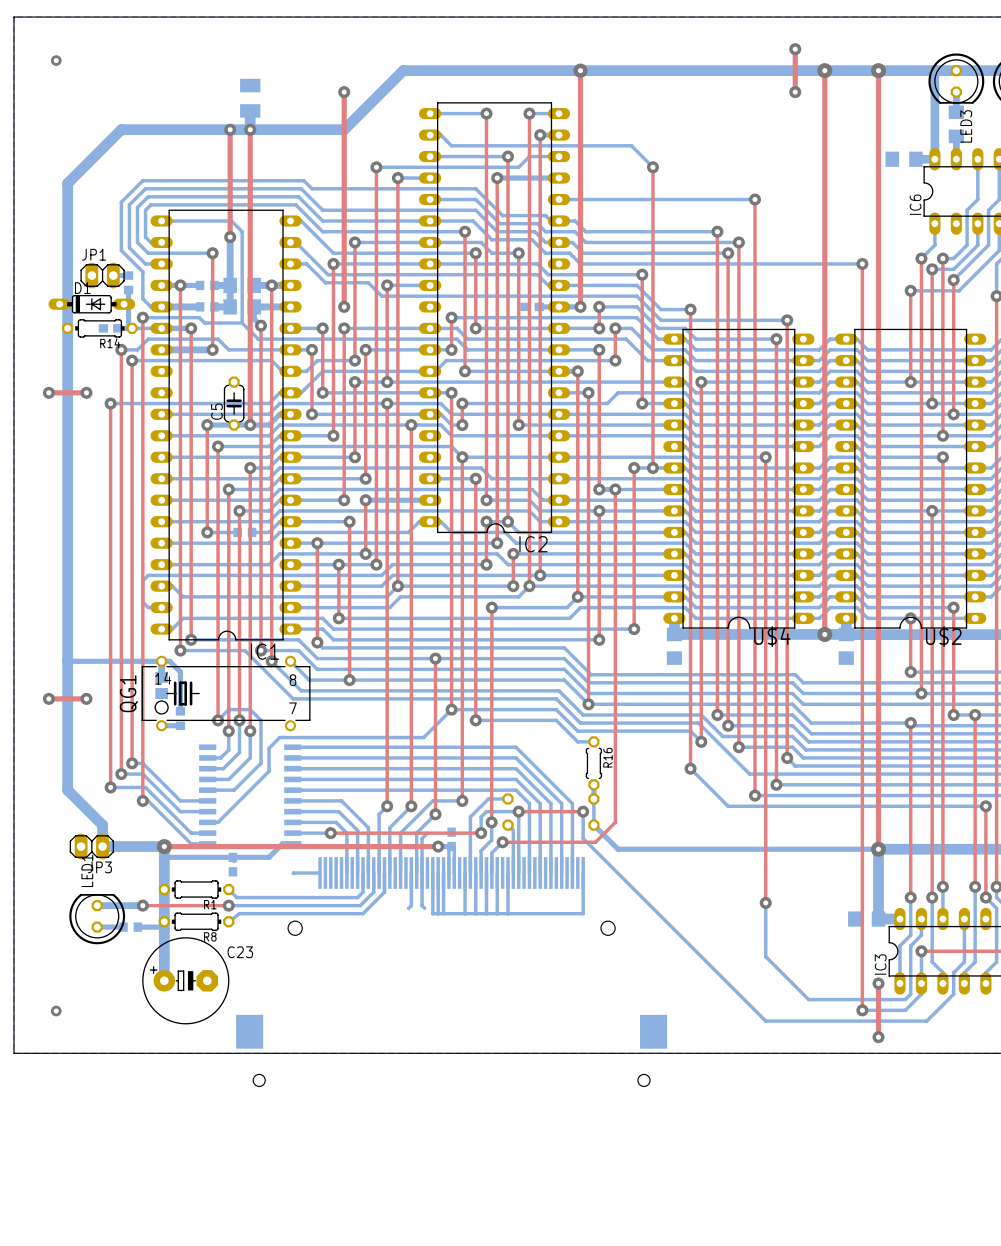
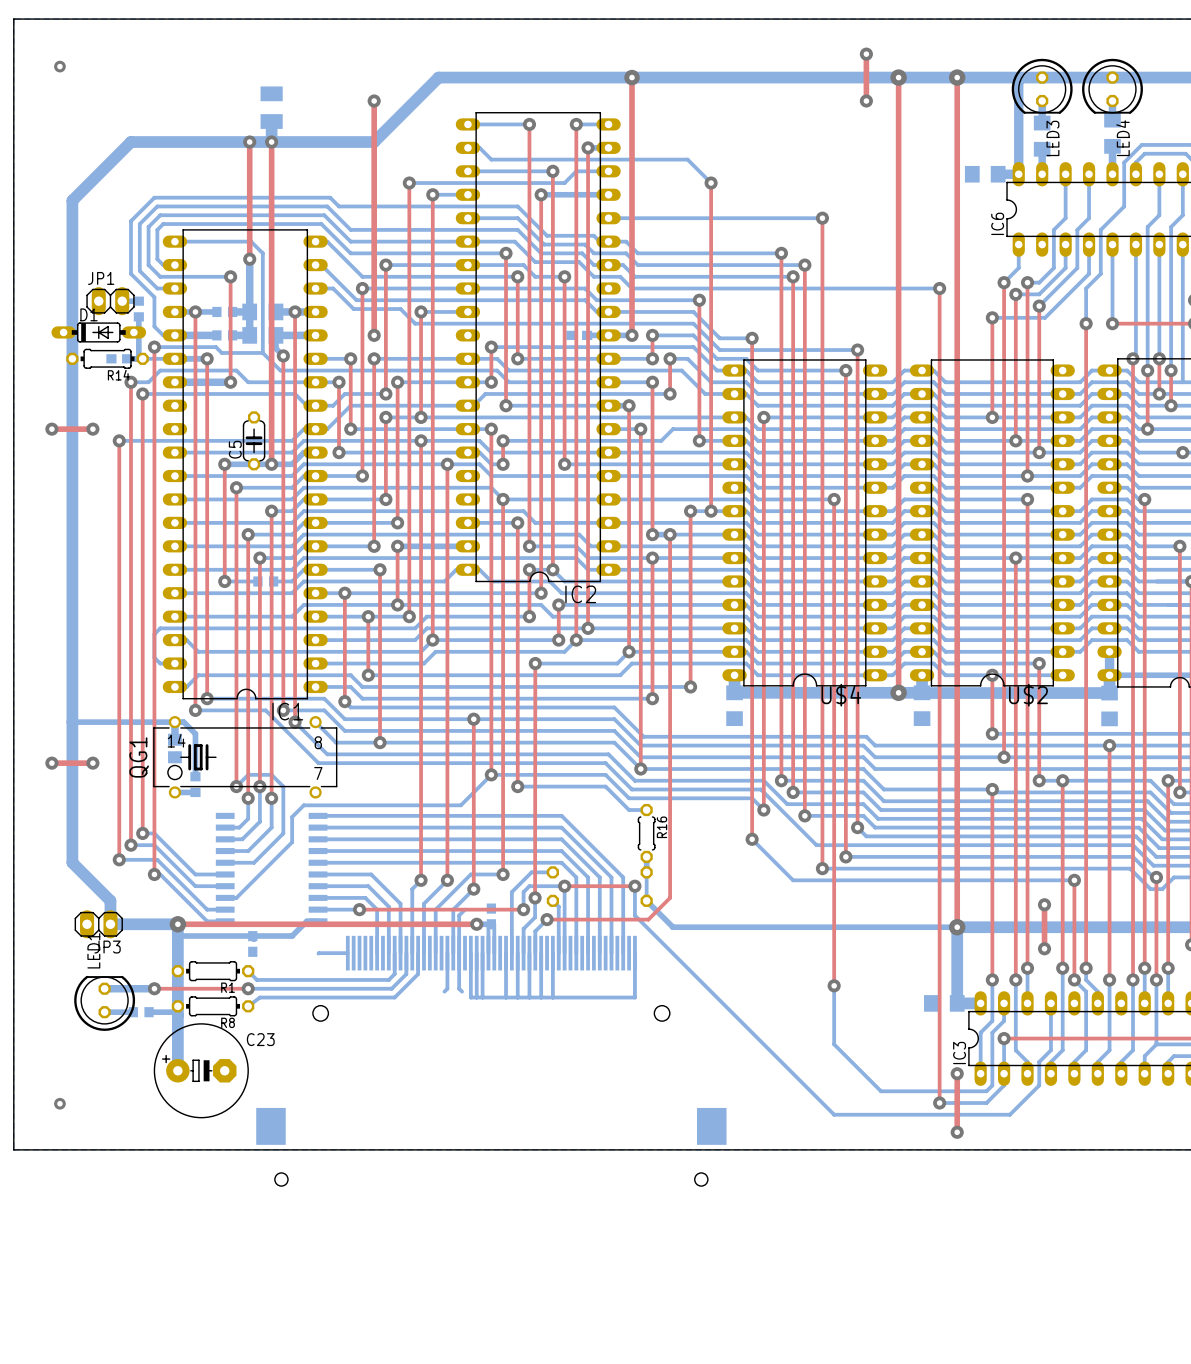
top track: none -> (1044, 904) (1044, 948)
via: none -> (1044, 904)
via: none -> (1044, 948)

